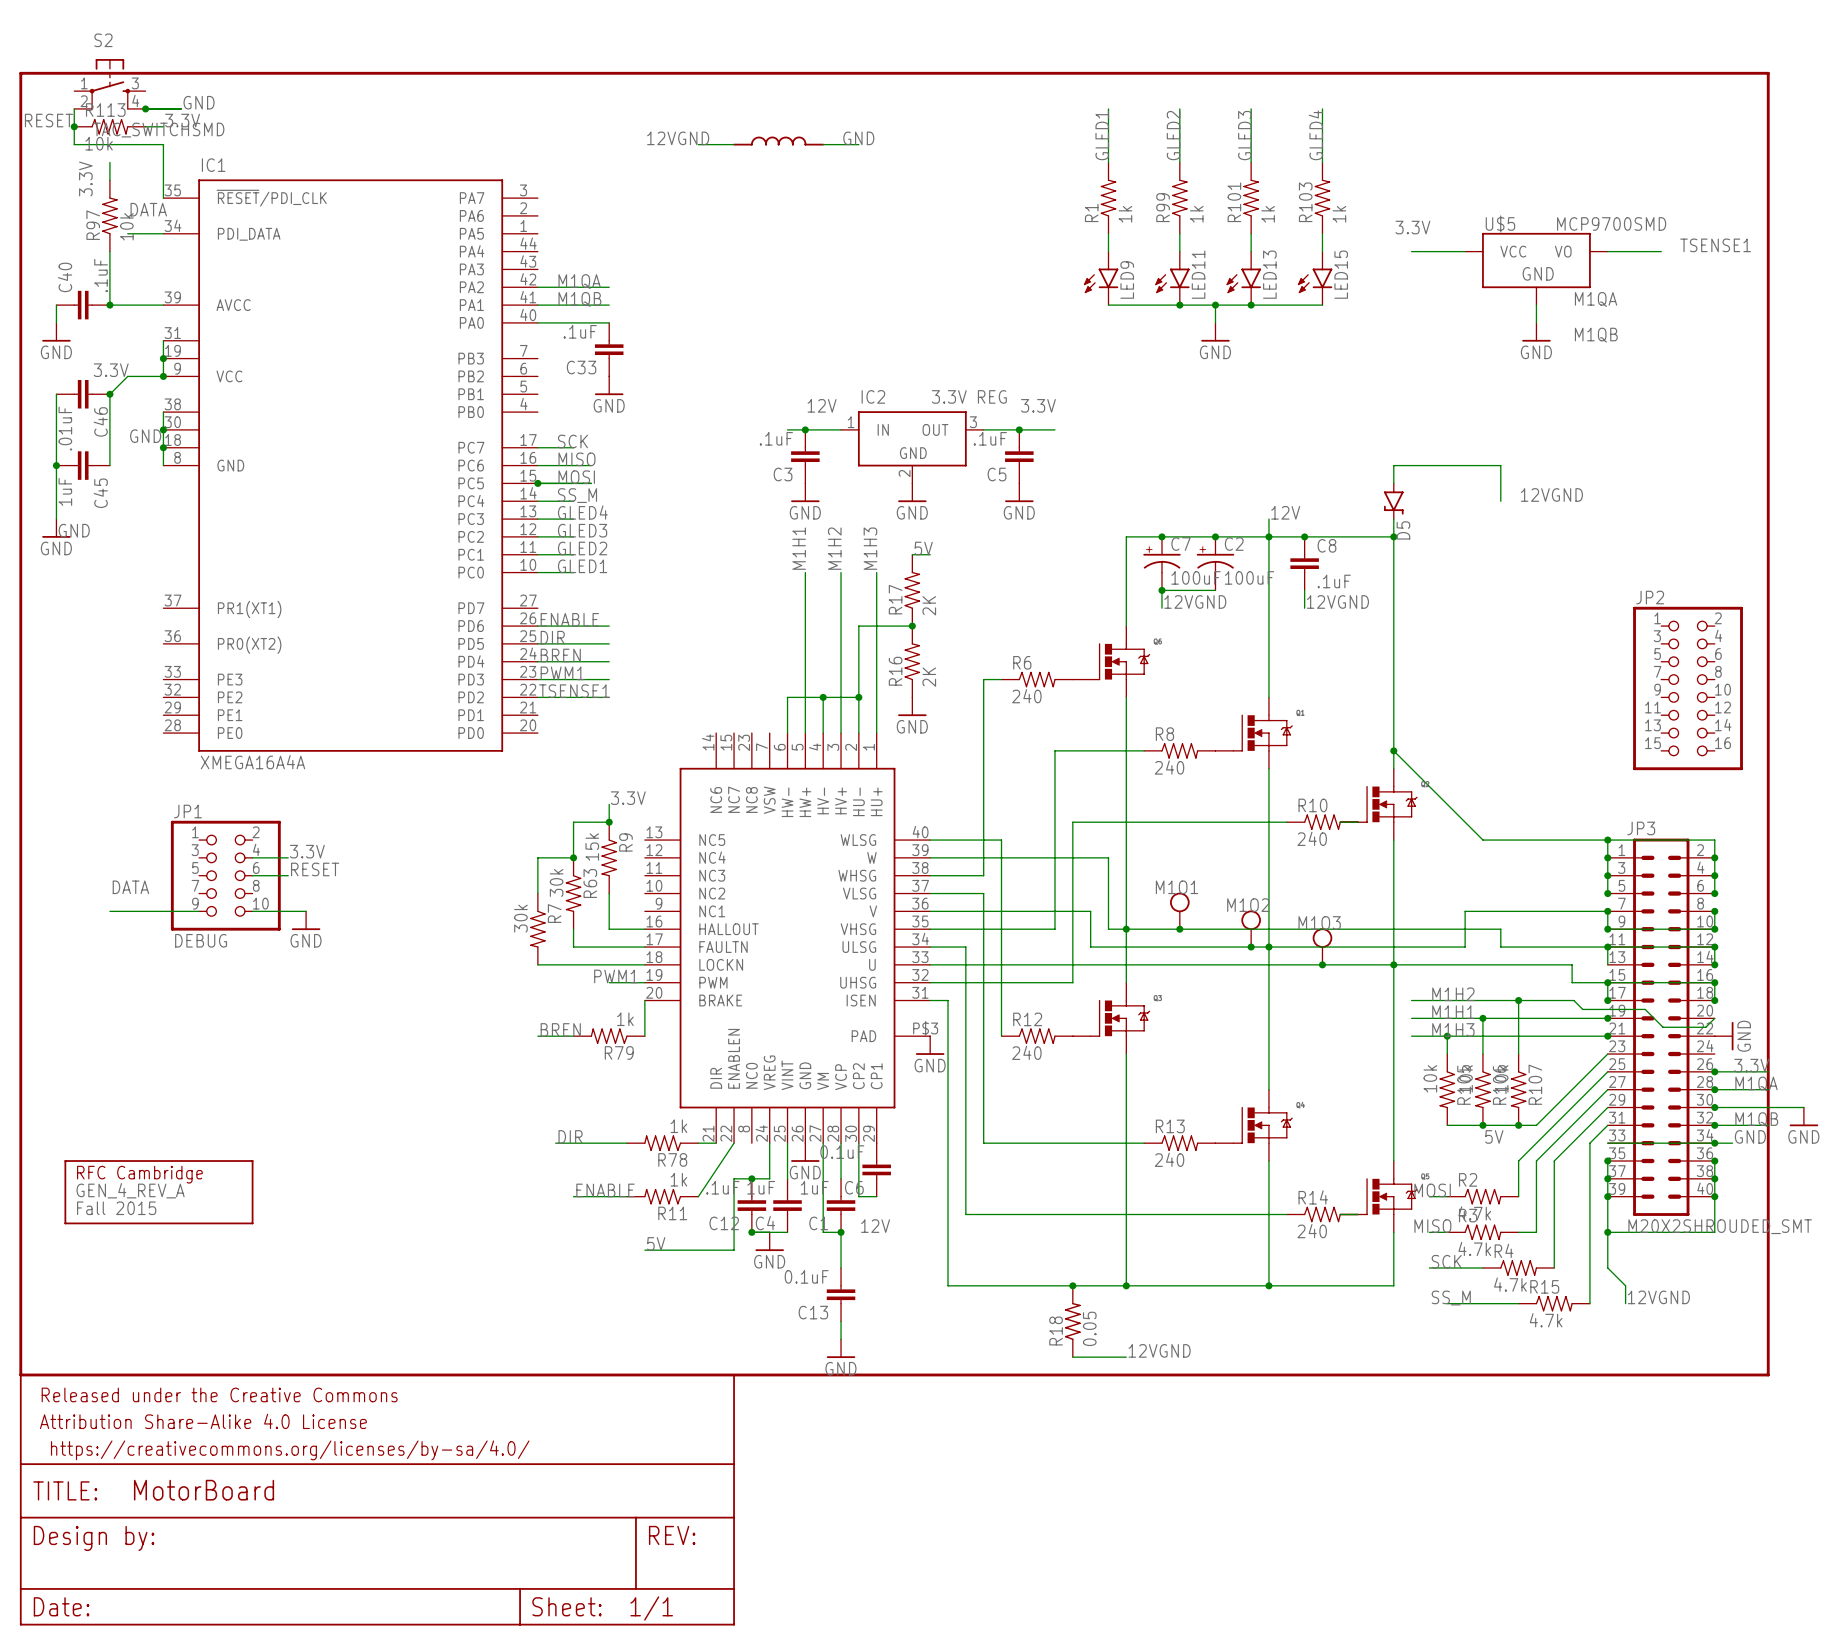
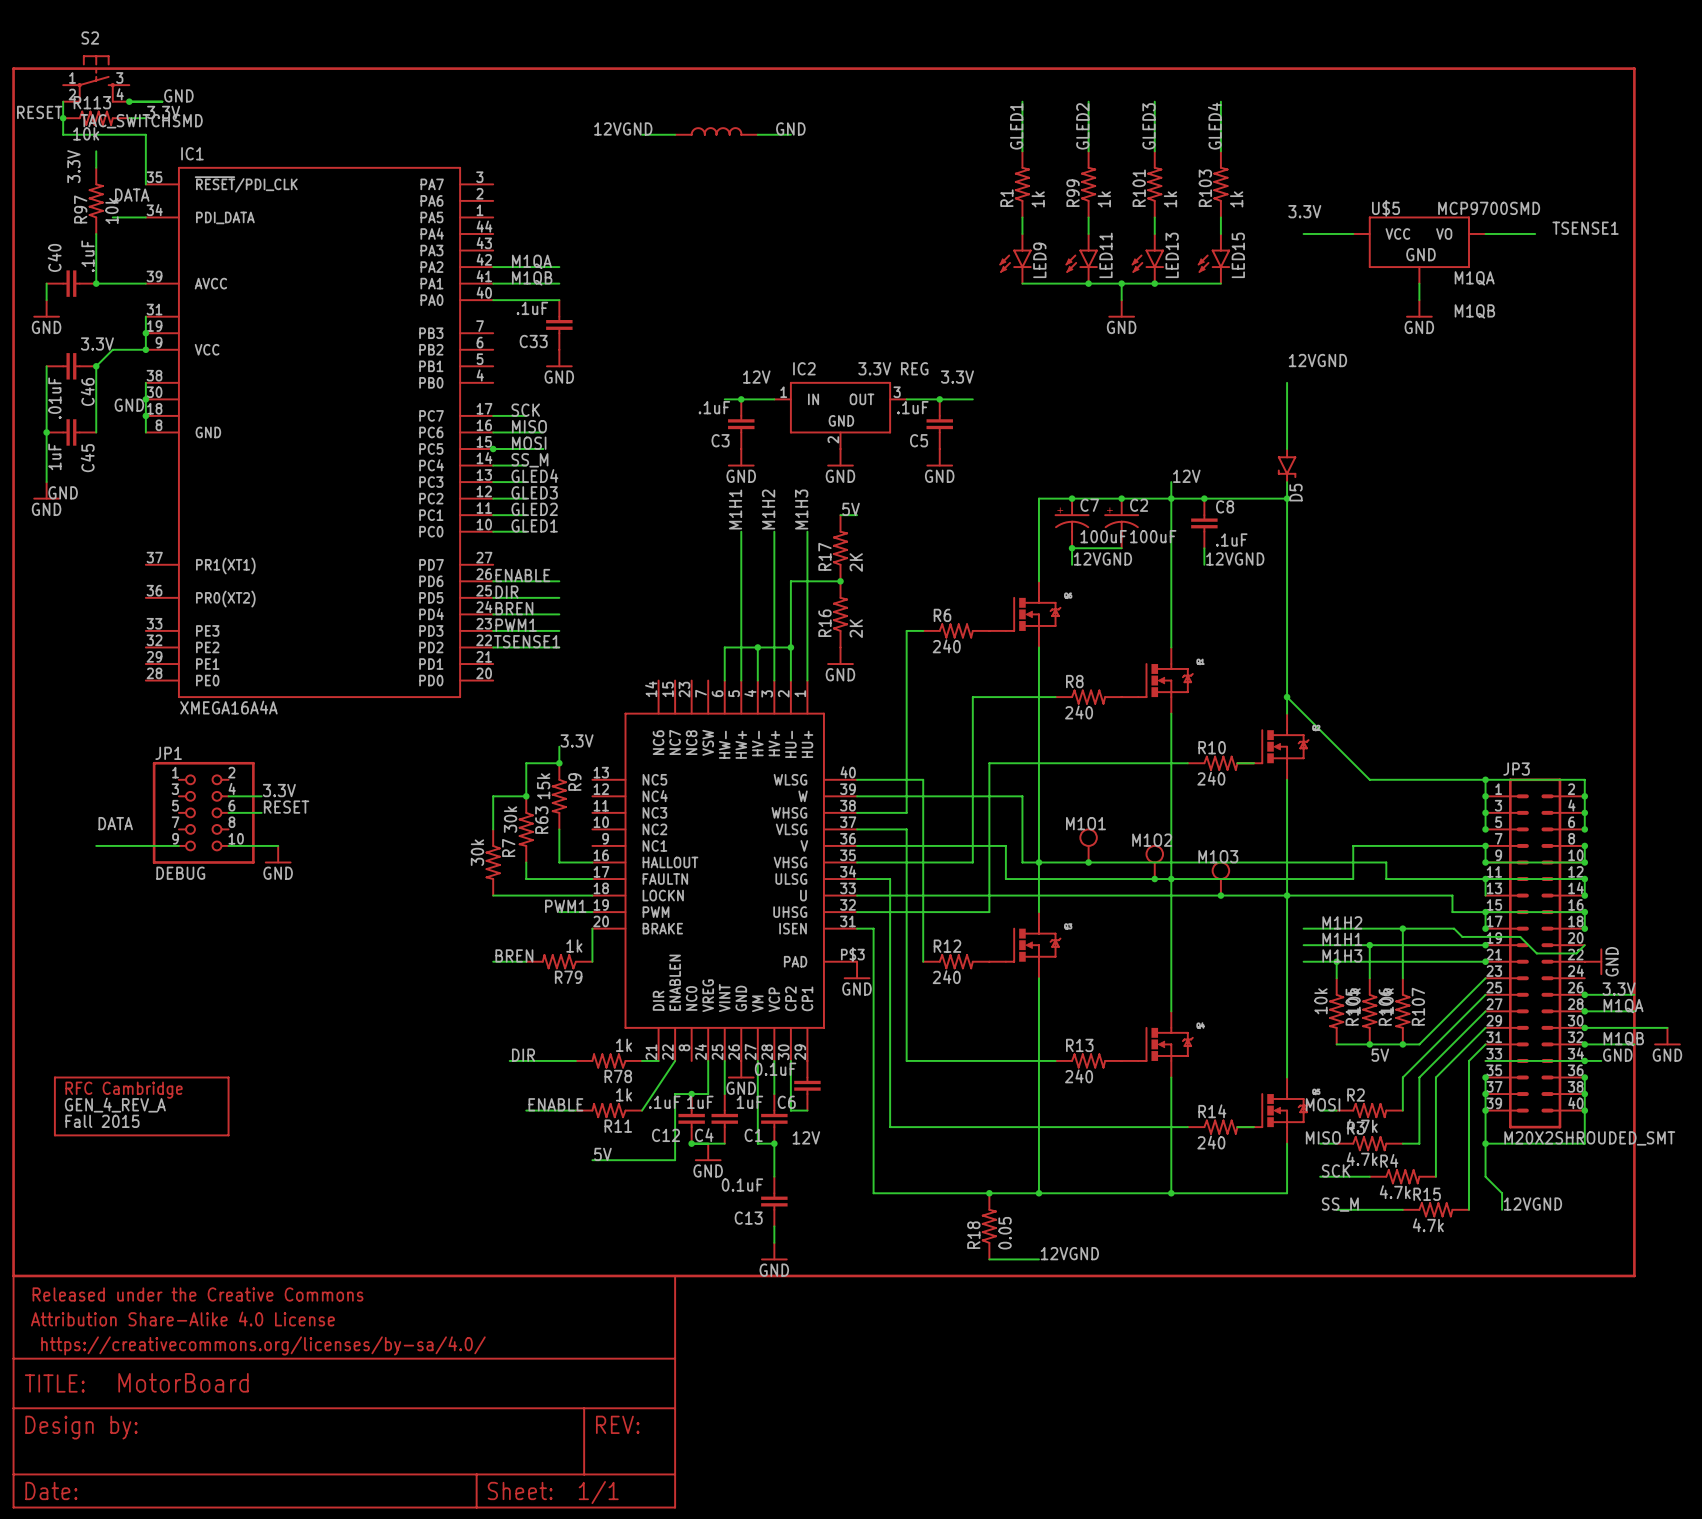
wire: (1393, 465) (1500, 465) (1500, 501) -> (1287, 432) (1287, 382)
label position: 12VGND (1551, 495) -> 12VGND (1317, 360)
JP2: (1688, 688) -> none

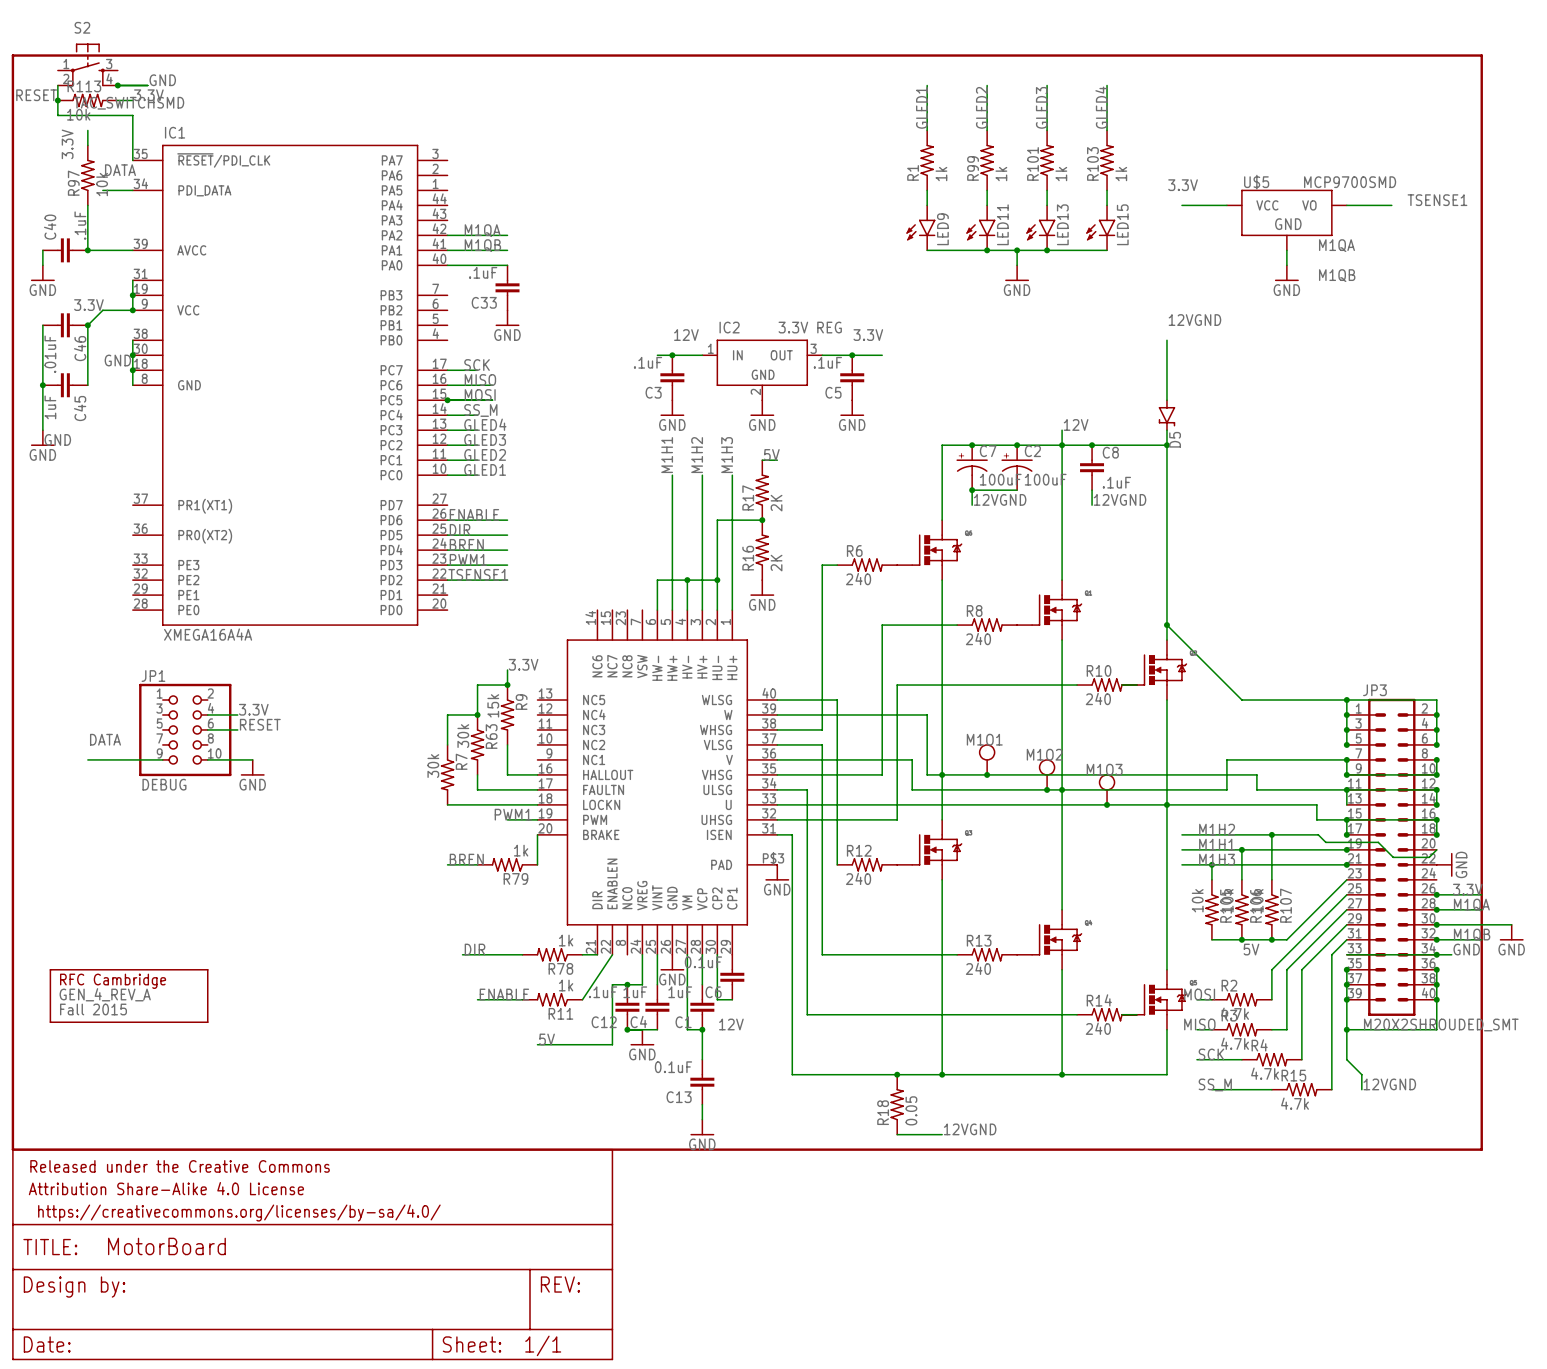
label: 12VGND (623, 128) -> none
label: GND (790, 128) -> none
part: (716, 131) -> none
wire: (642, 134) (675, 134) -> none
wire: (757, 134) (790, 134) -> none

